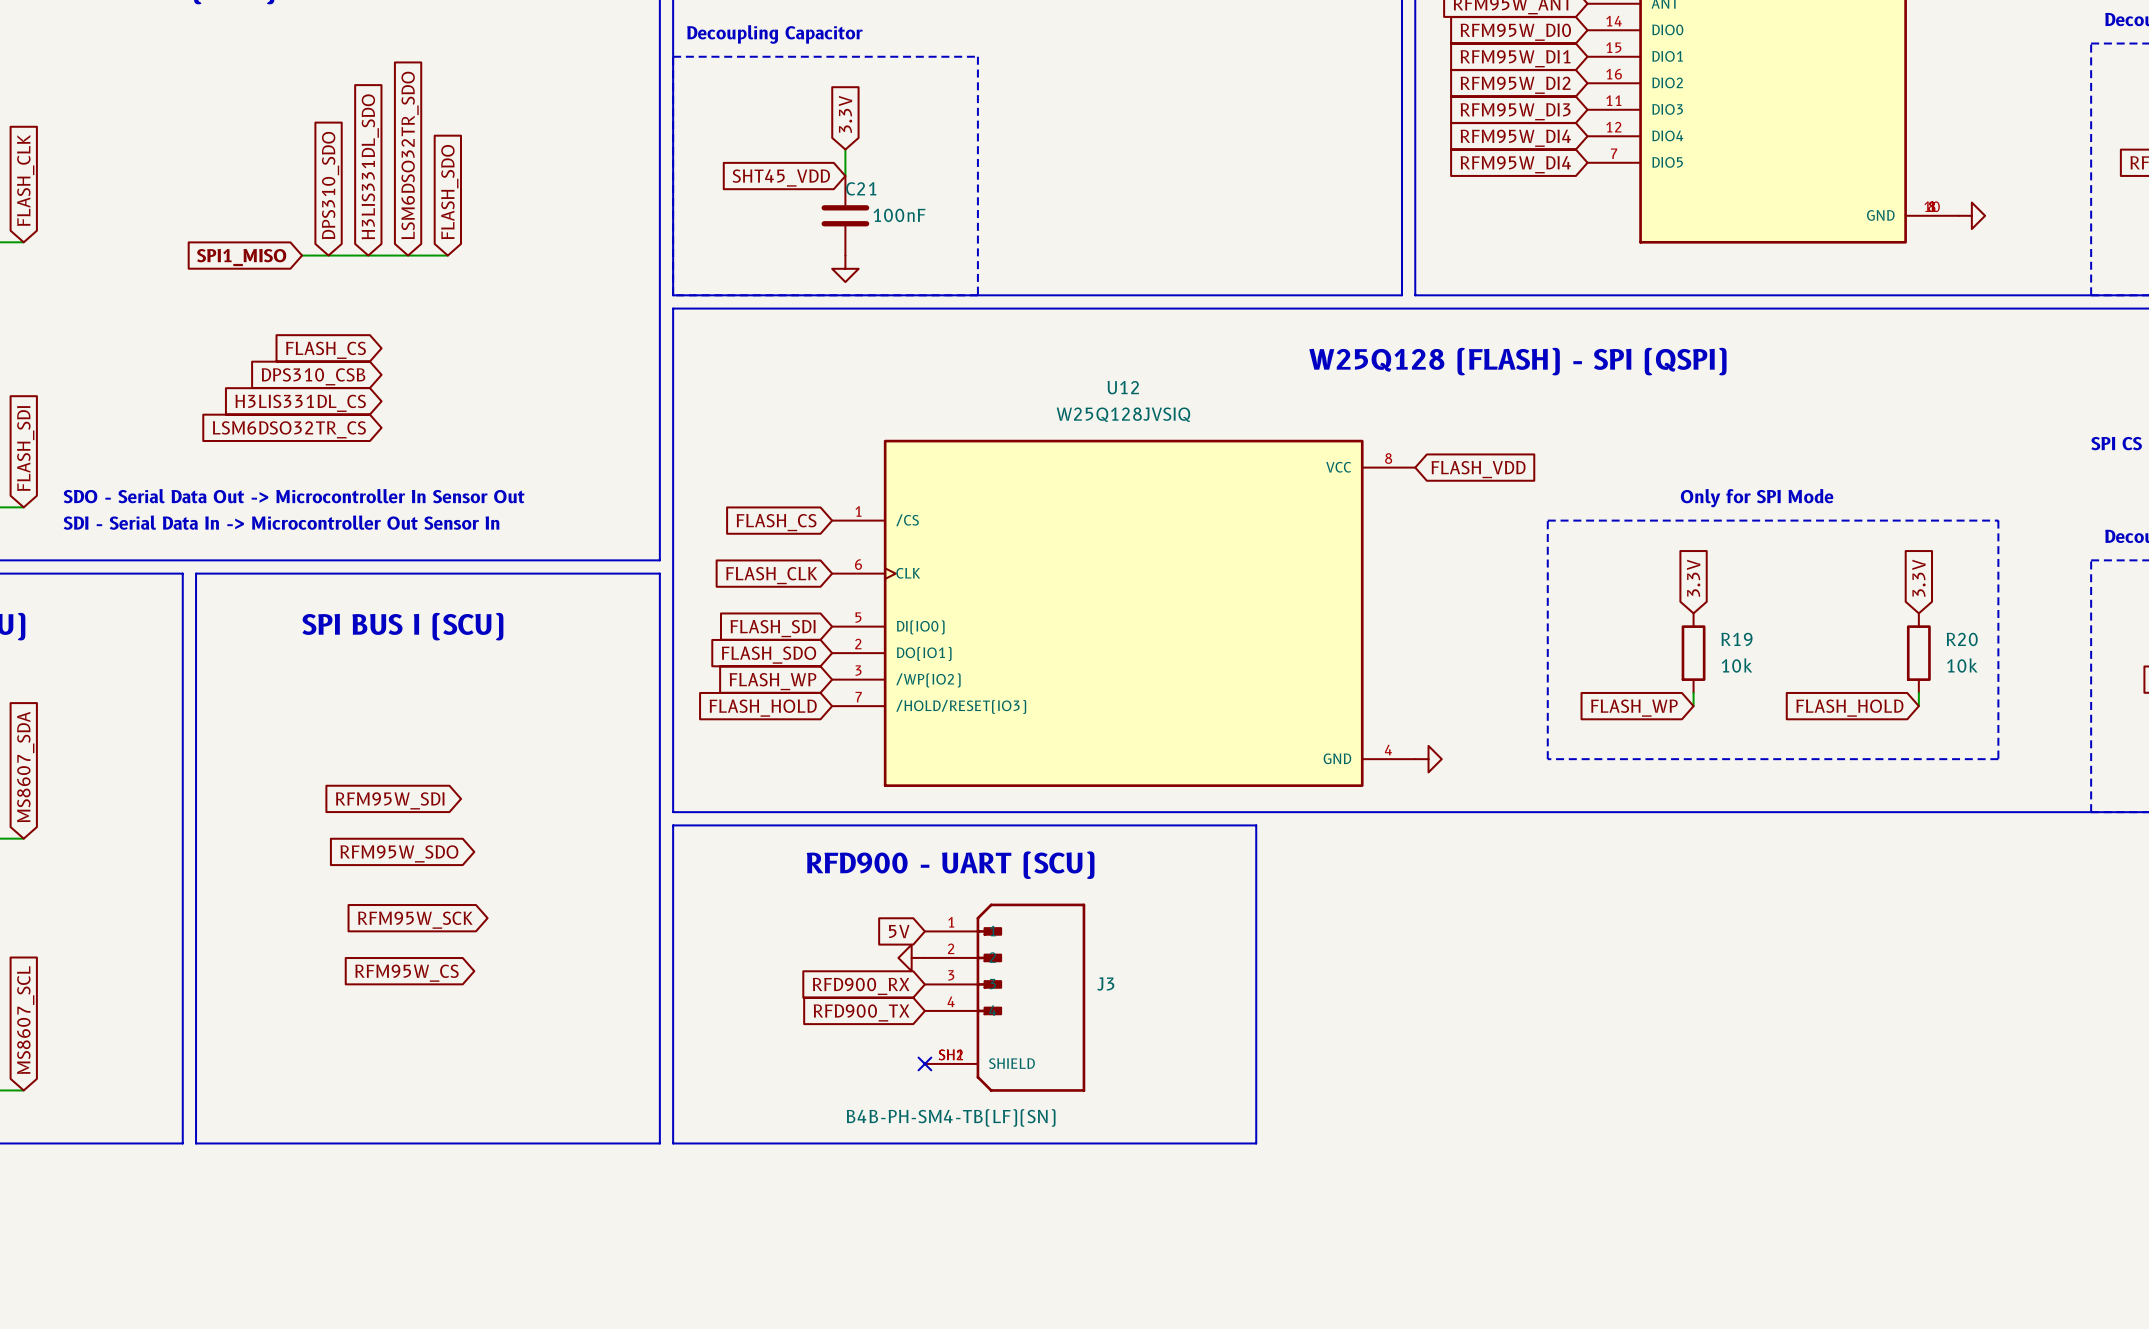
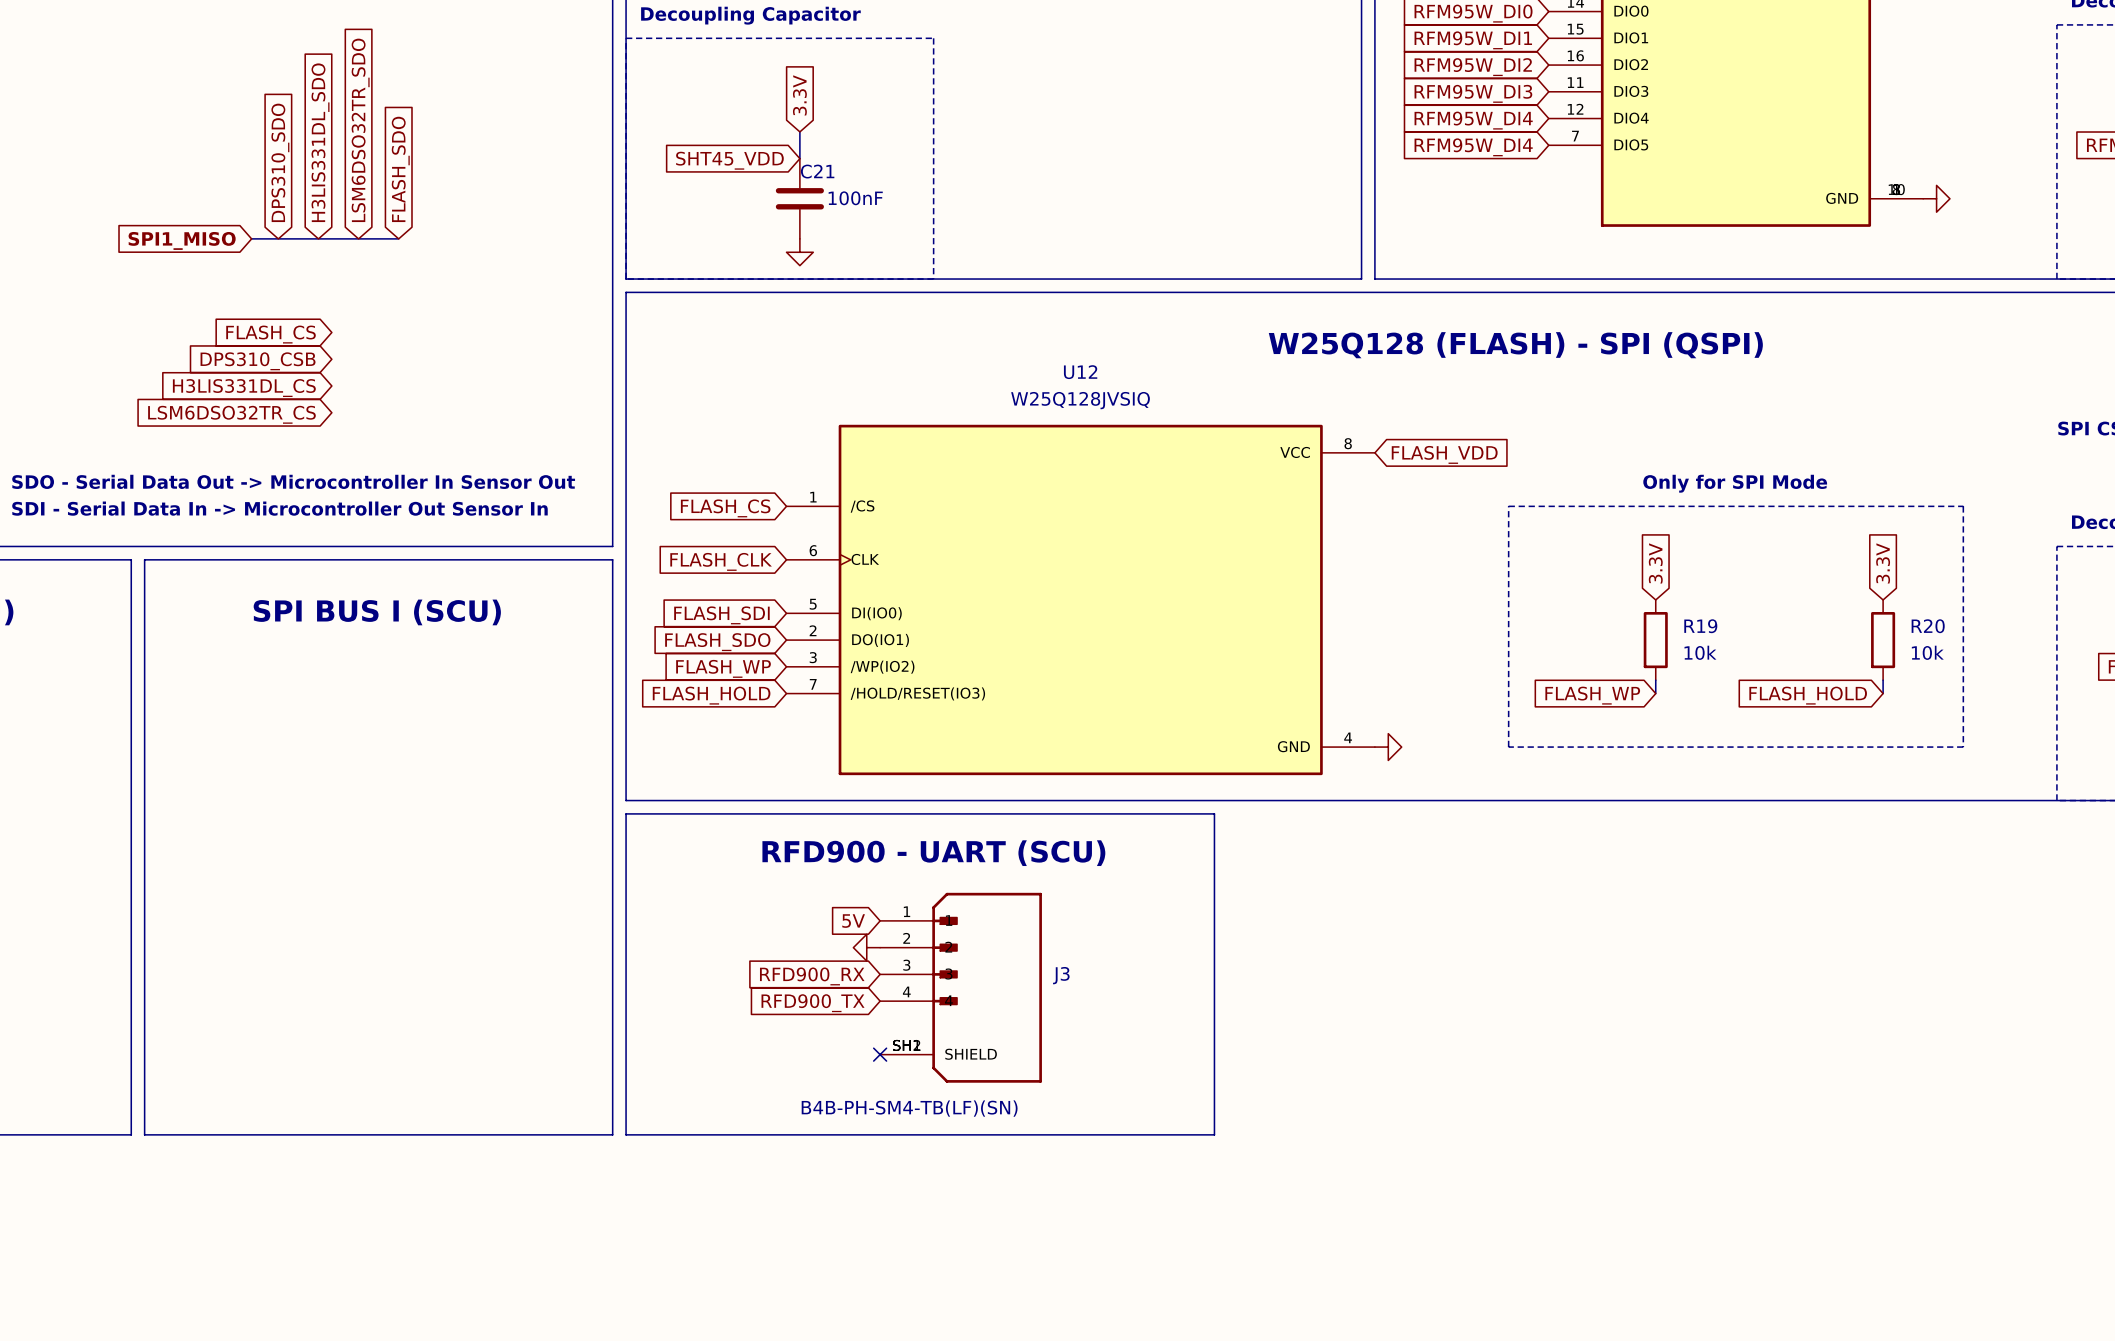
global label: RFM95W_SDI (390, 800) -> none
global label: RFM95W_SDO (399, 853) -> none
global label: RFM95W_SCK (415, 920) -> none
global label: RFM95W_CS (406, 973) -> none

